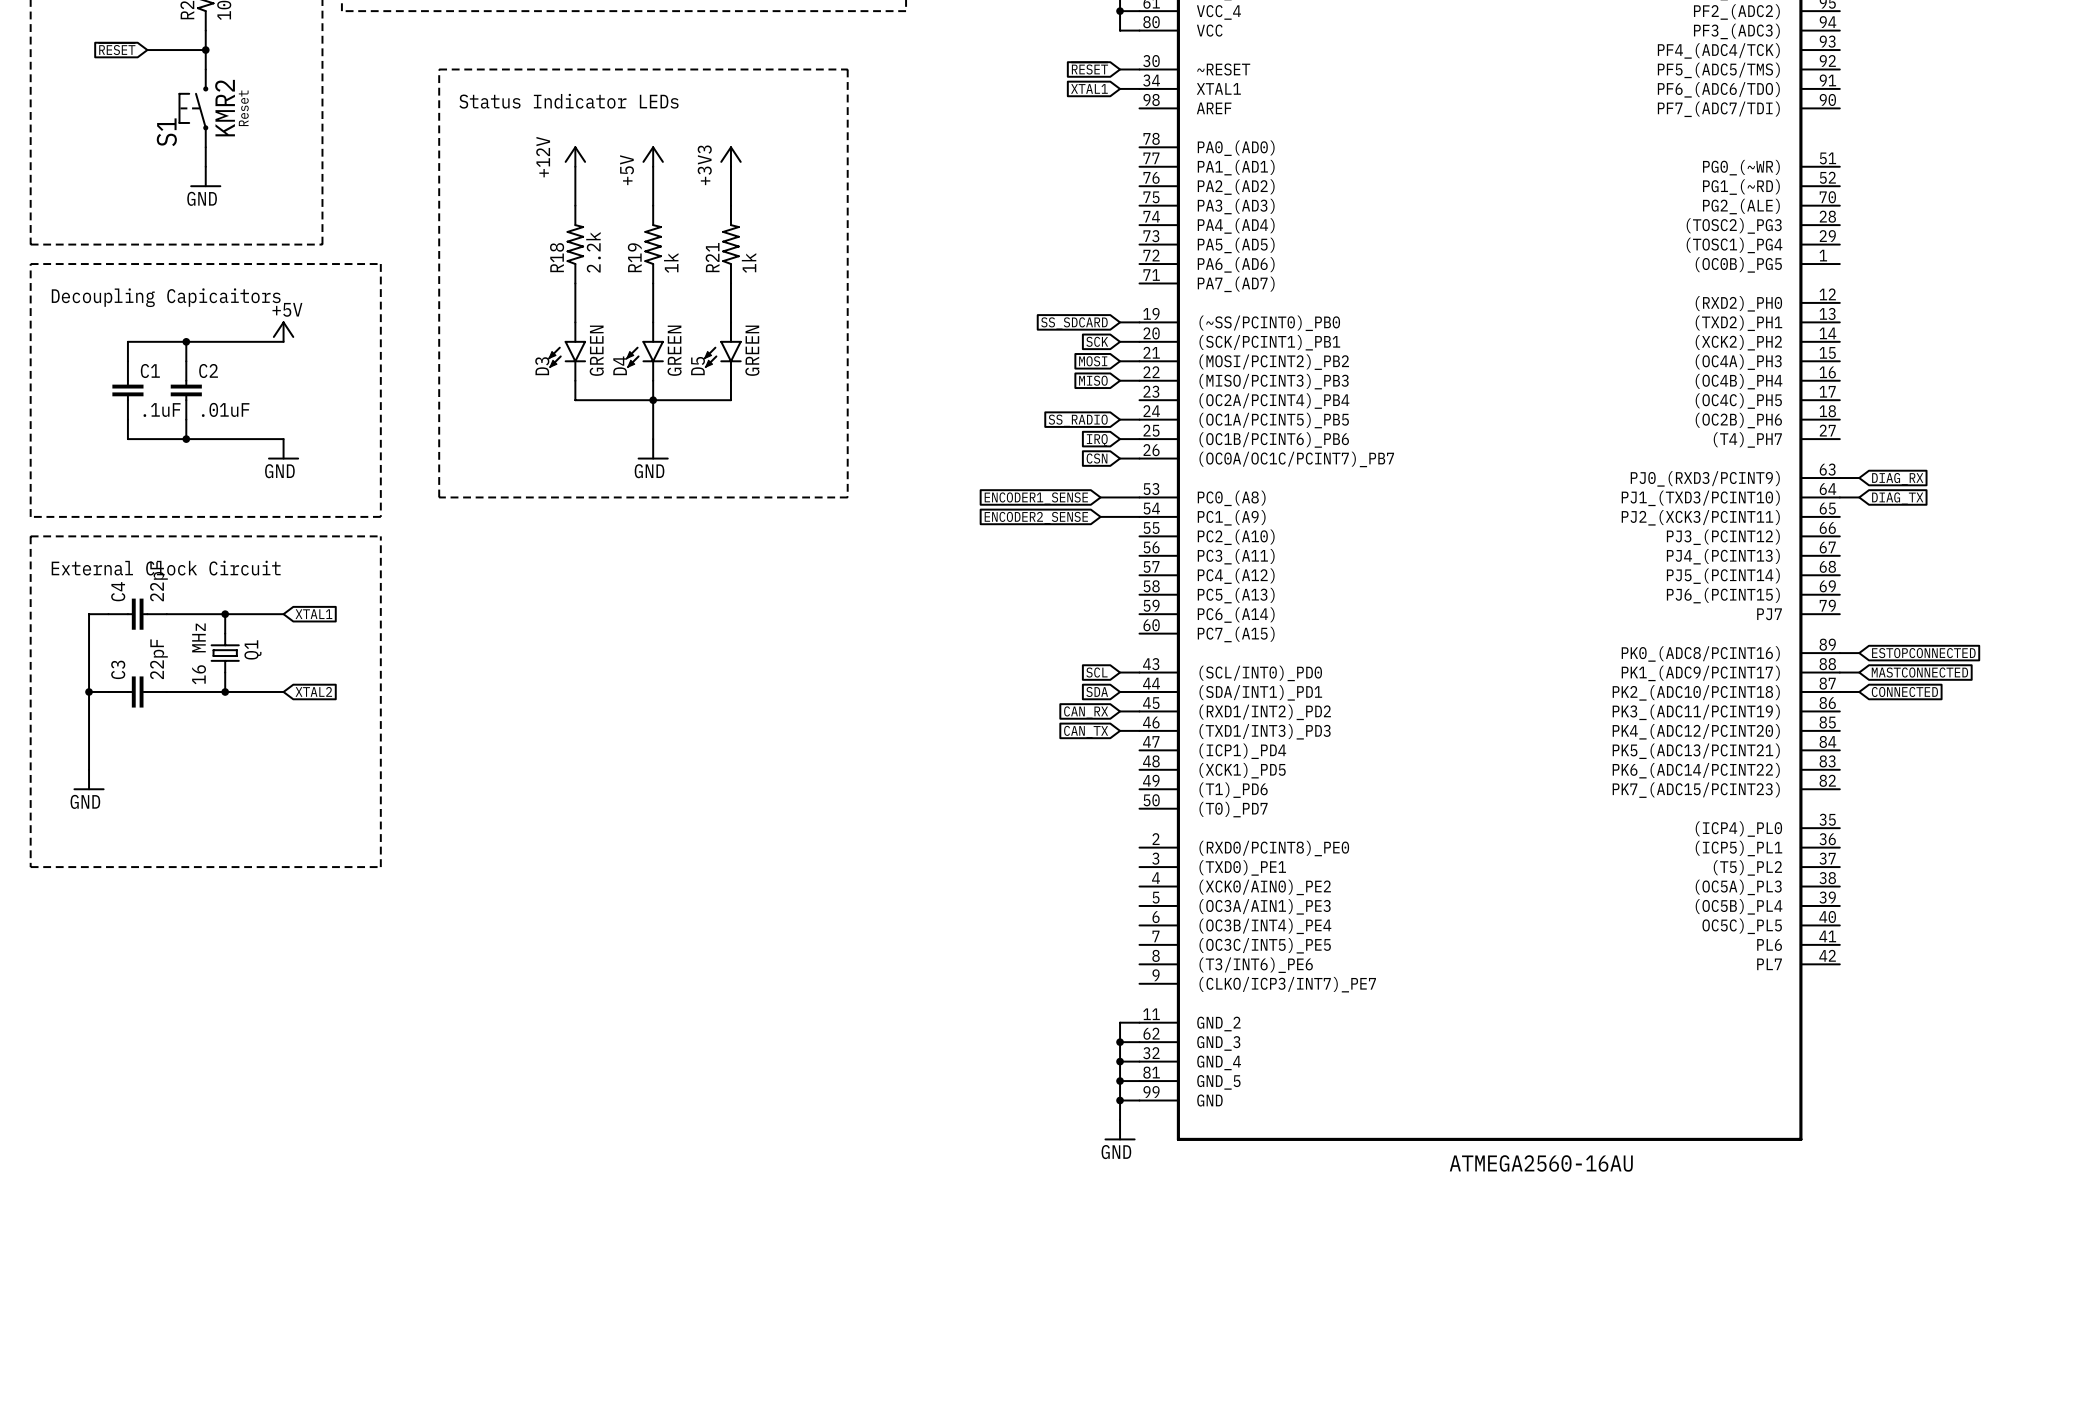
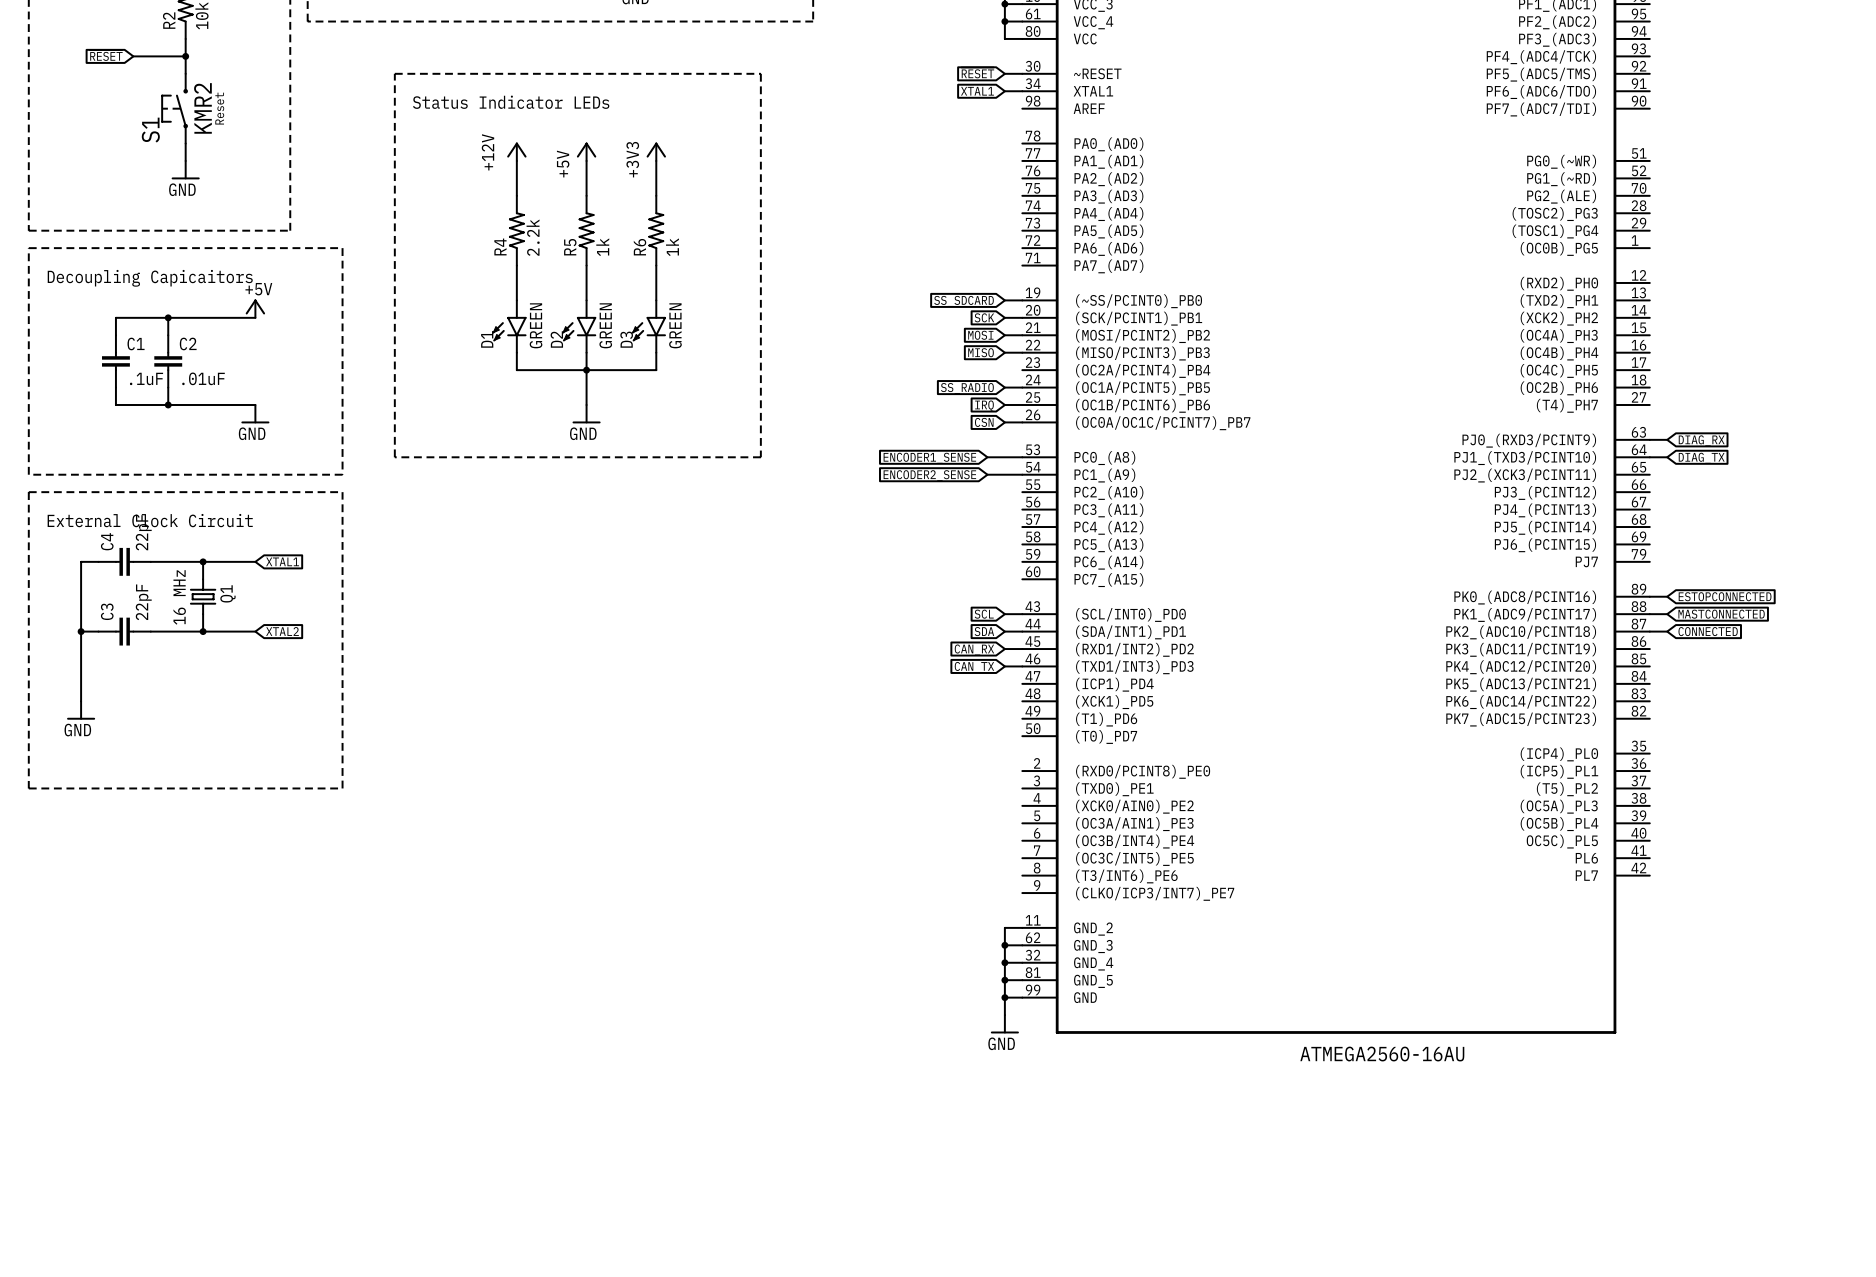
R18 name: R18 (557, 257) -> R4 (500, 246)
R19 name: R19 (634, 257) -> R5 (570, 247)
R21 name: R21 (712, 257) -> R6 (640, 247)
D4 name: D4 (620, 365) -> D2 (556, 339)
D3 name: D3 (542, 366) -> D1 (487, 339)
D5 name: D5 (698, 366) -> D3 (626, 339)

